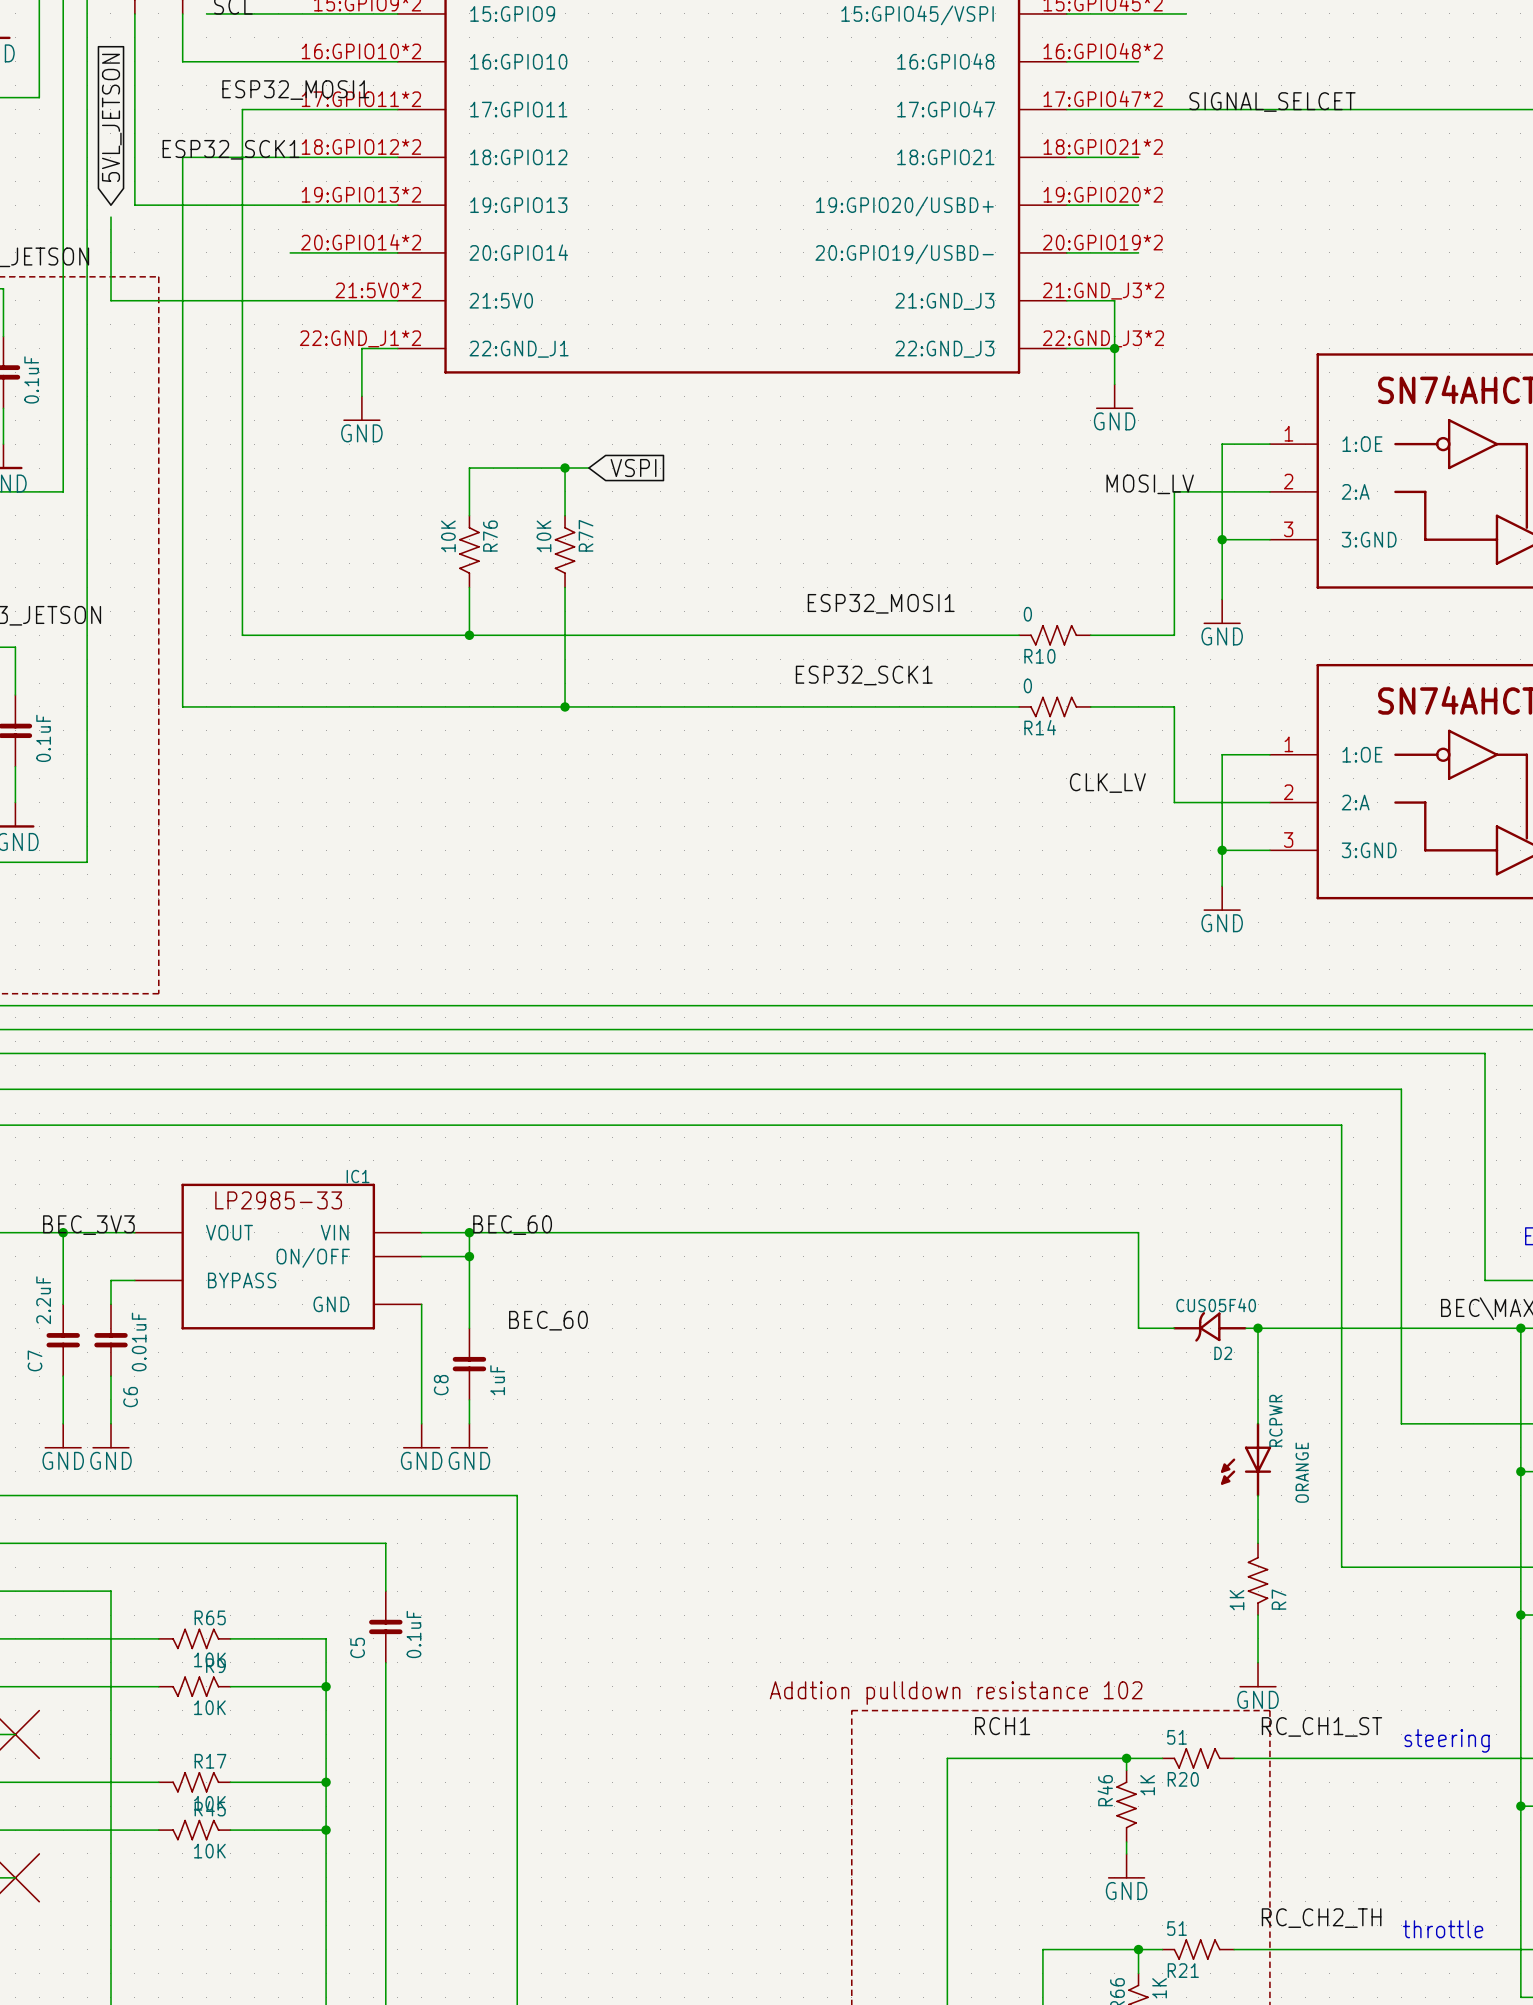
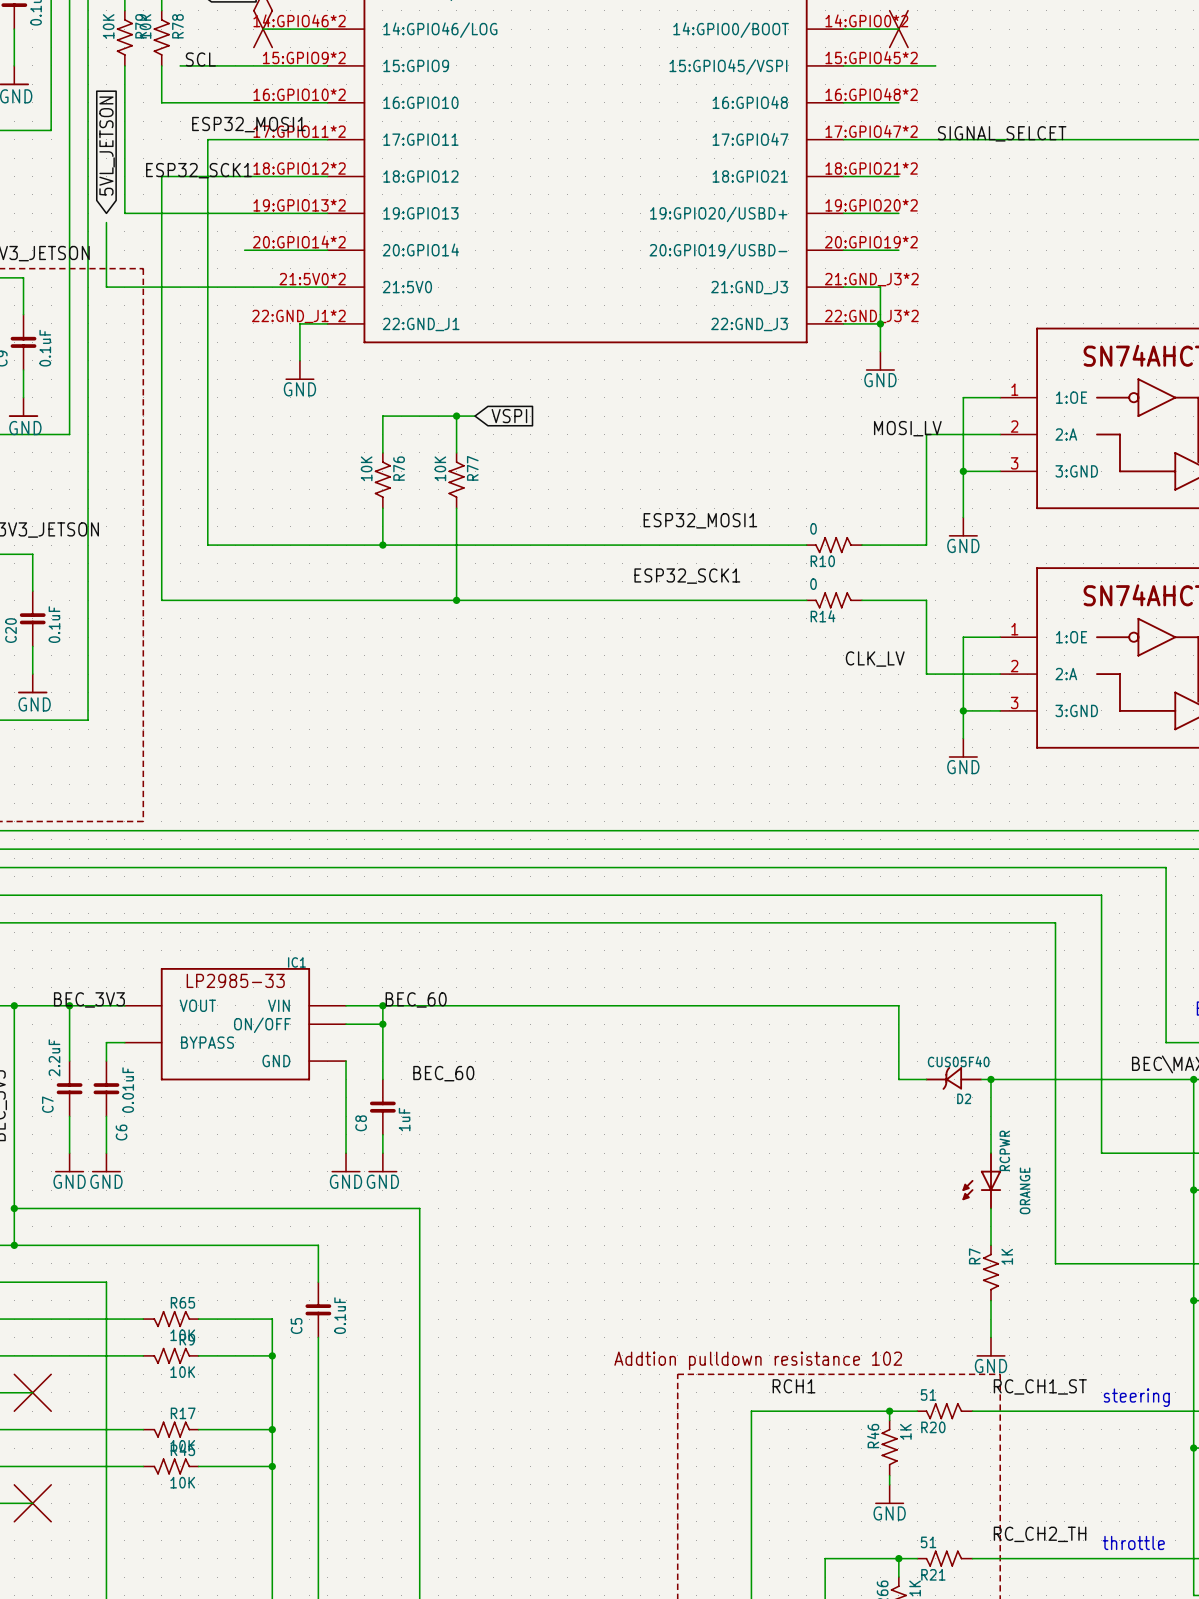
R7 rotation: 0° (1258, 1579) -> 180° (990, 1272)

